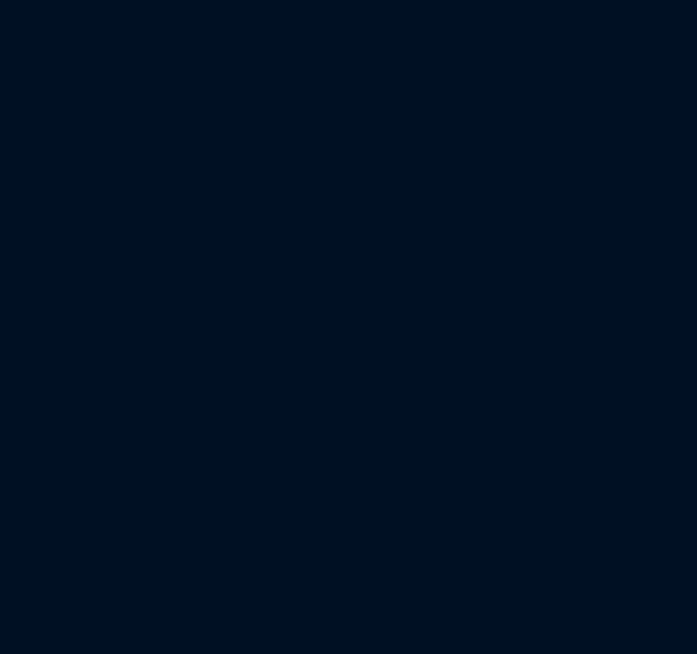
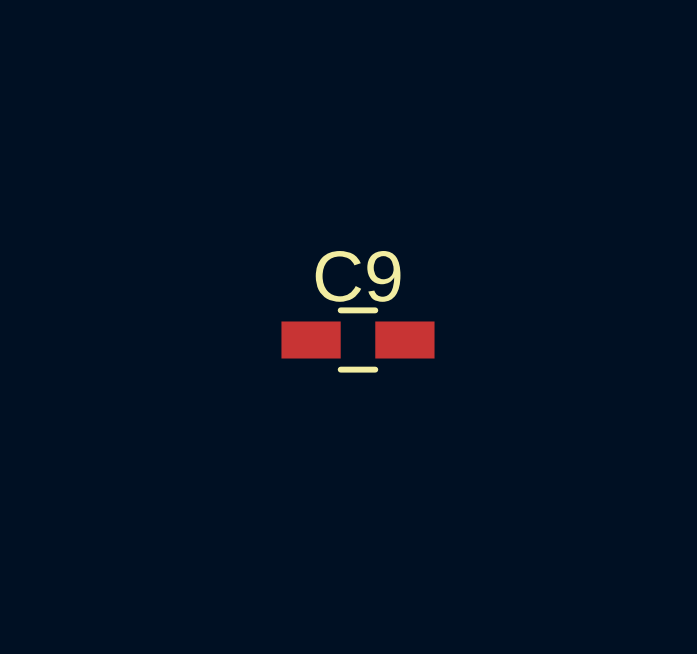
C9: none -> (357, 340)

